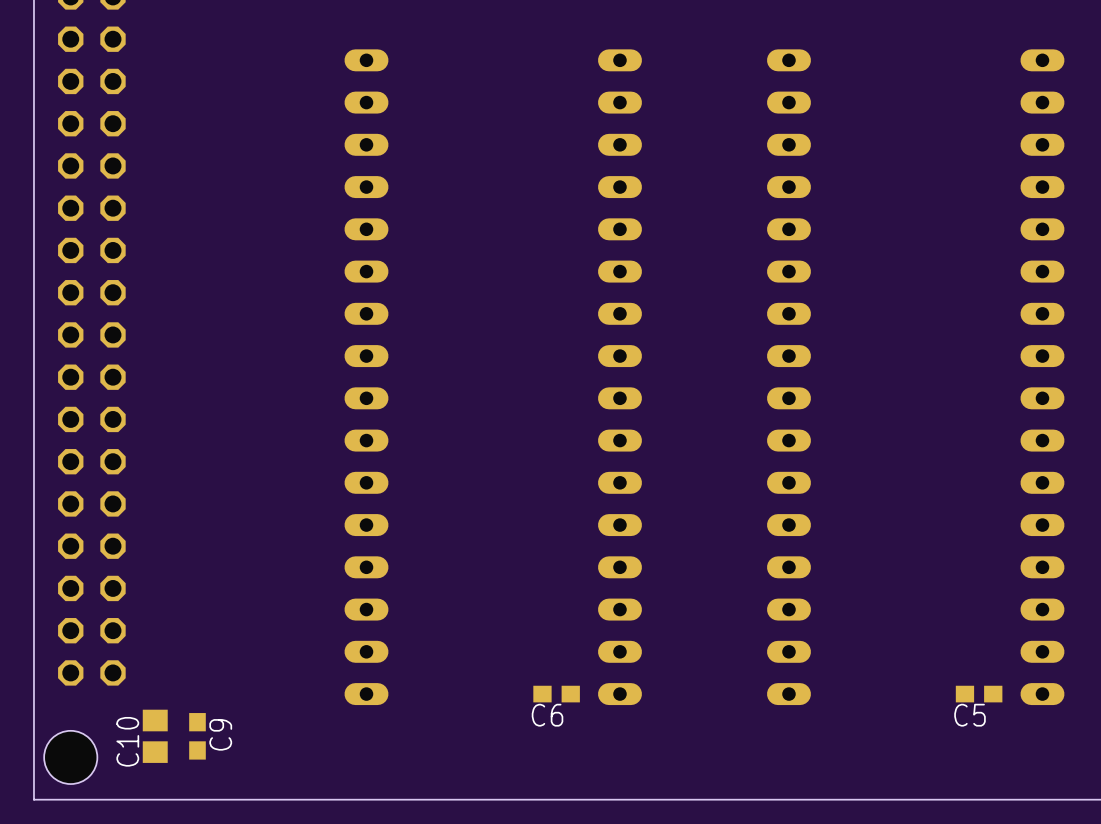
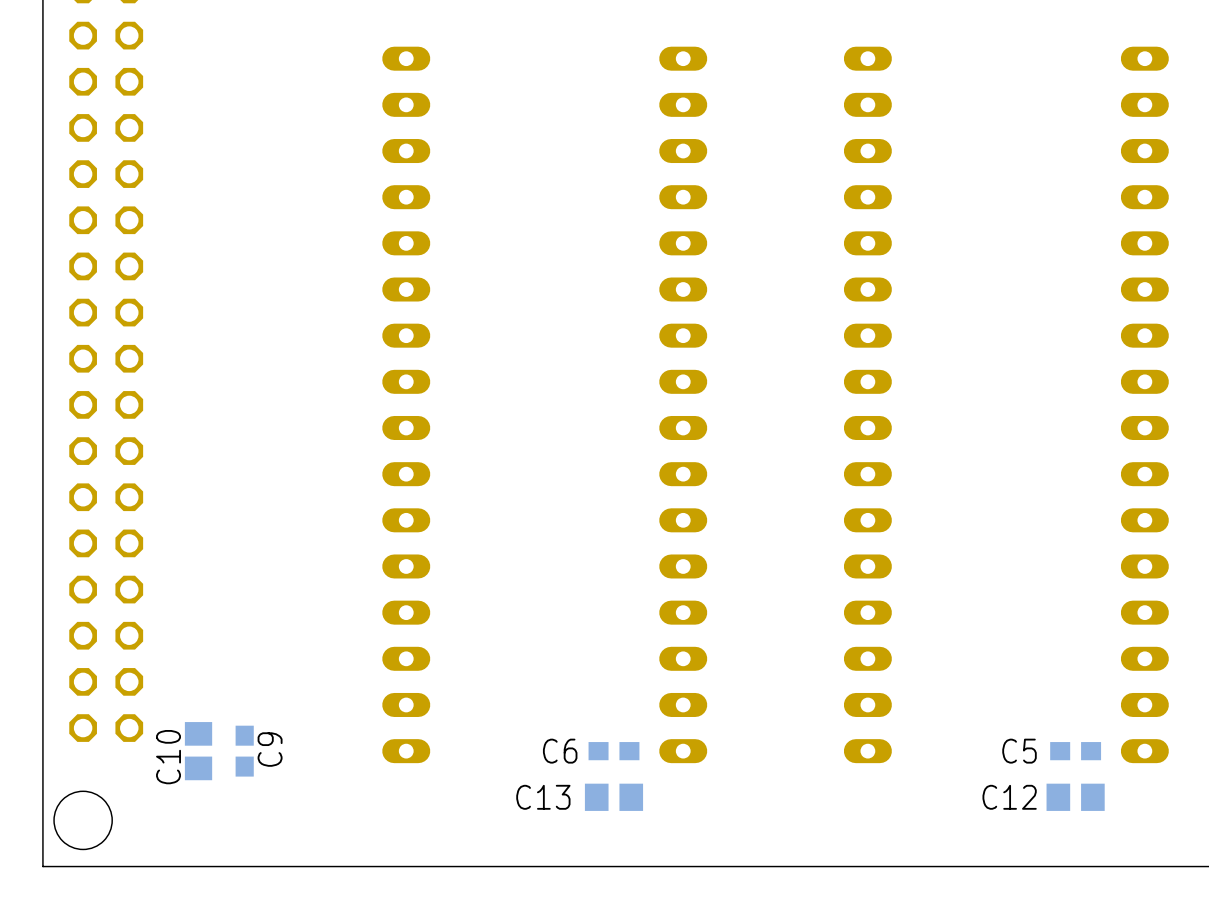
C6 name position: C6 (547, 715) -> C6 (560, 751)
C5 name position: C5 (969, 715) -> C5 (1019, 751)
C10 position: (155, 736) -> (198, 751)
C9 position: (197, 736) -> (244, 751)
C13: none -> (613, 797)
C12: none -> (1075, 797)

